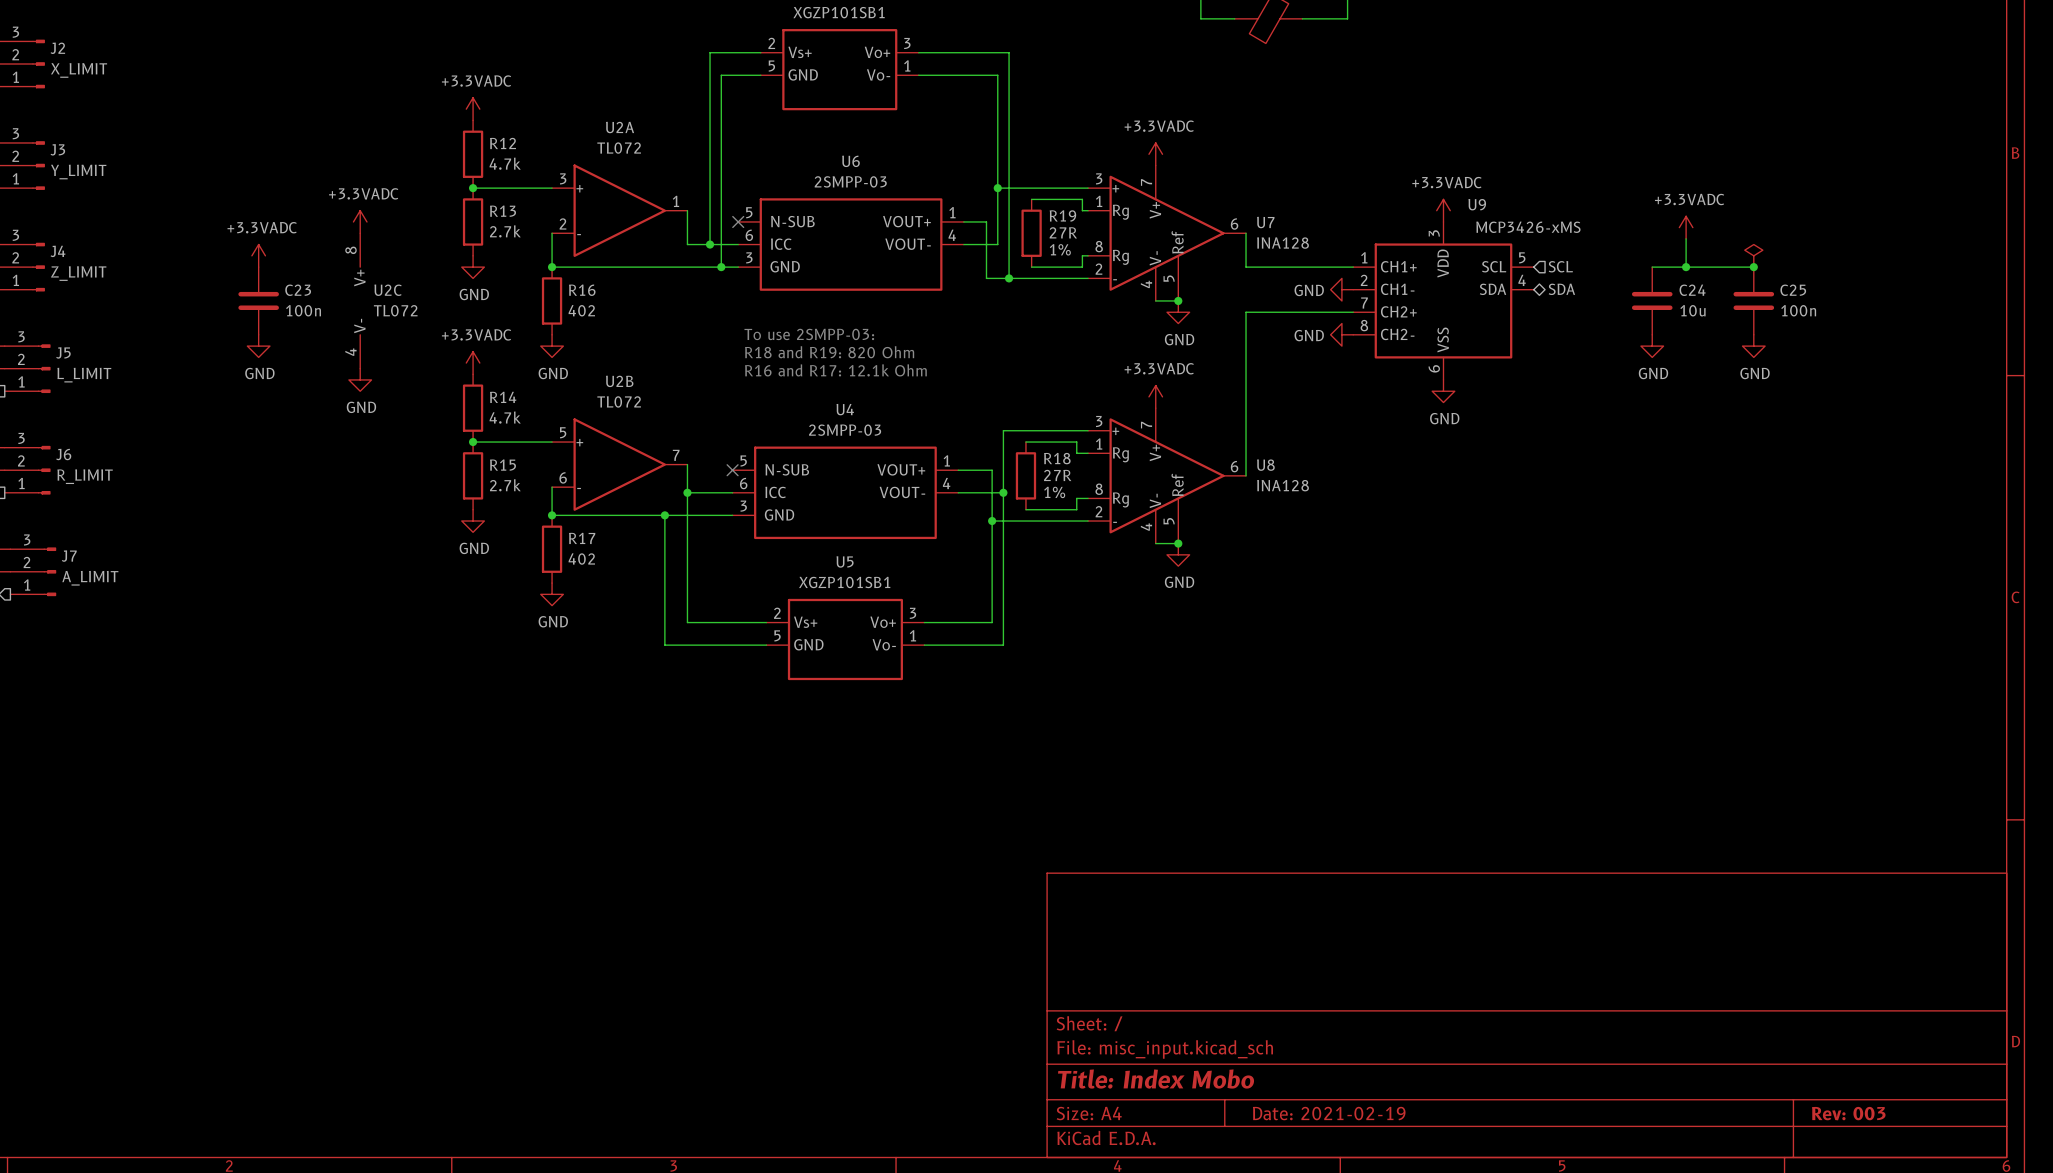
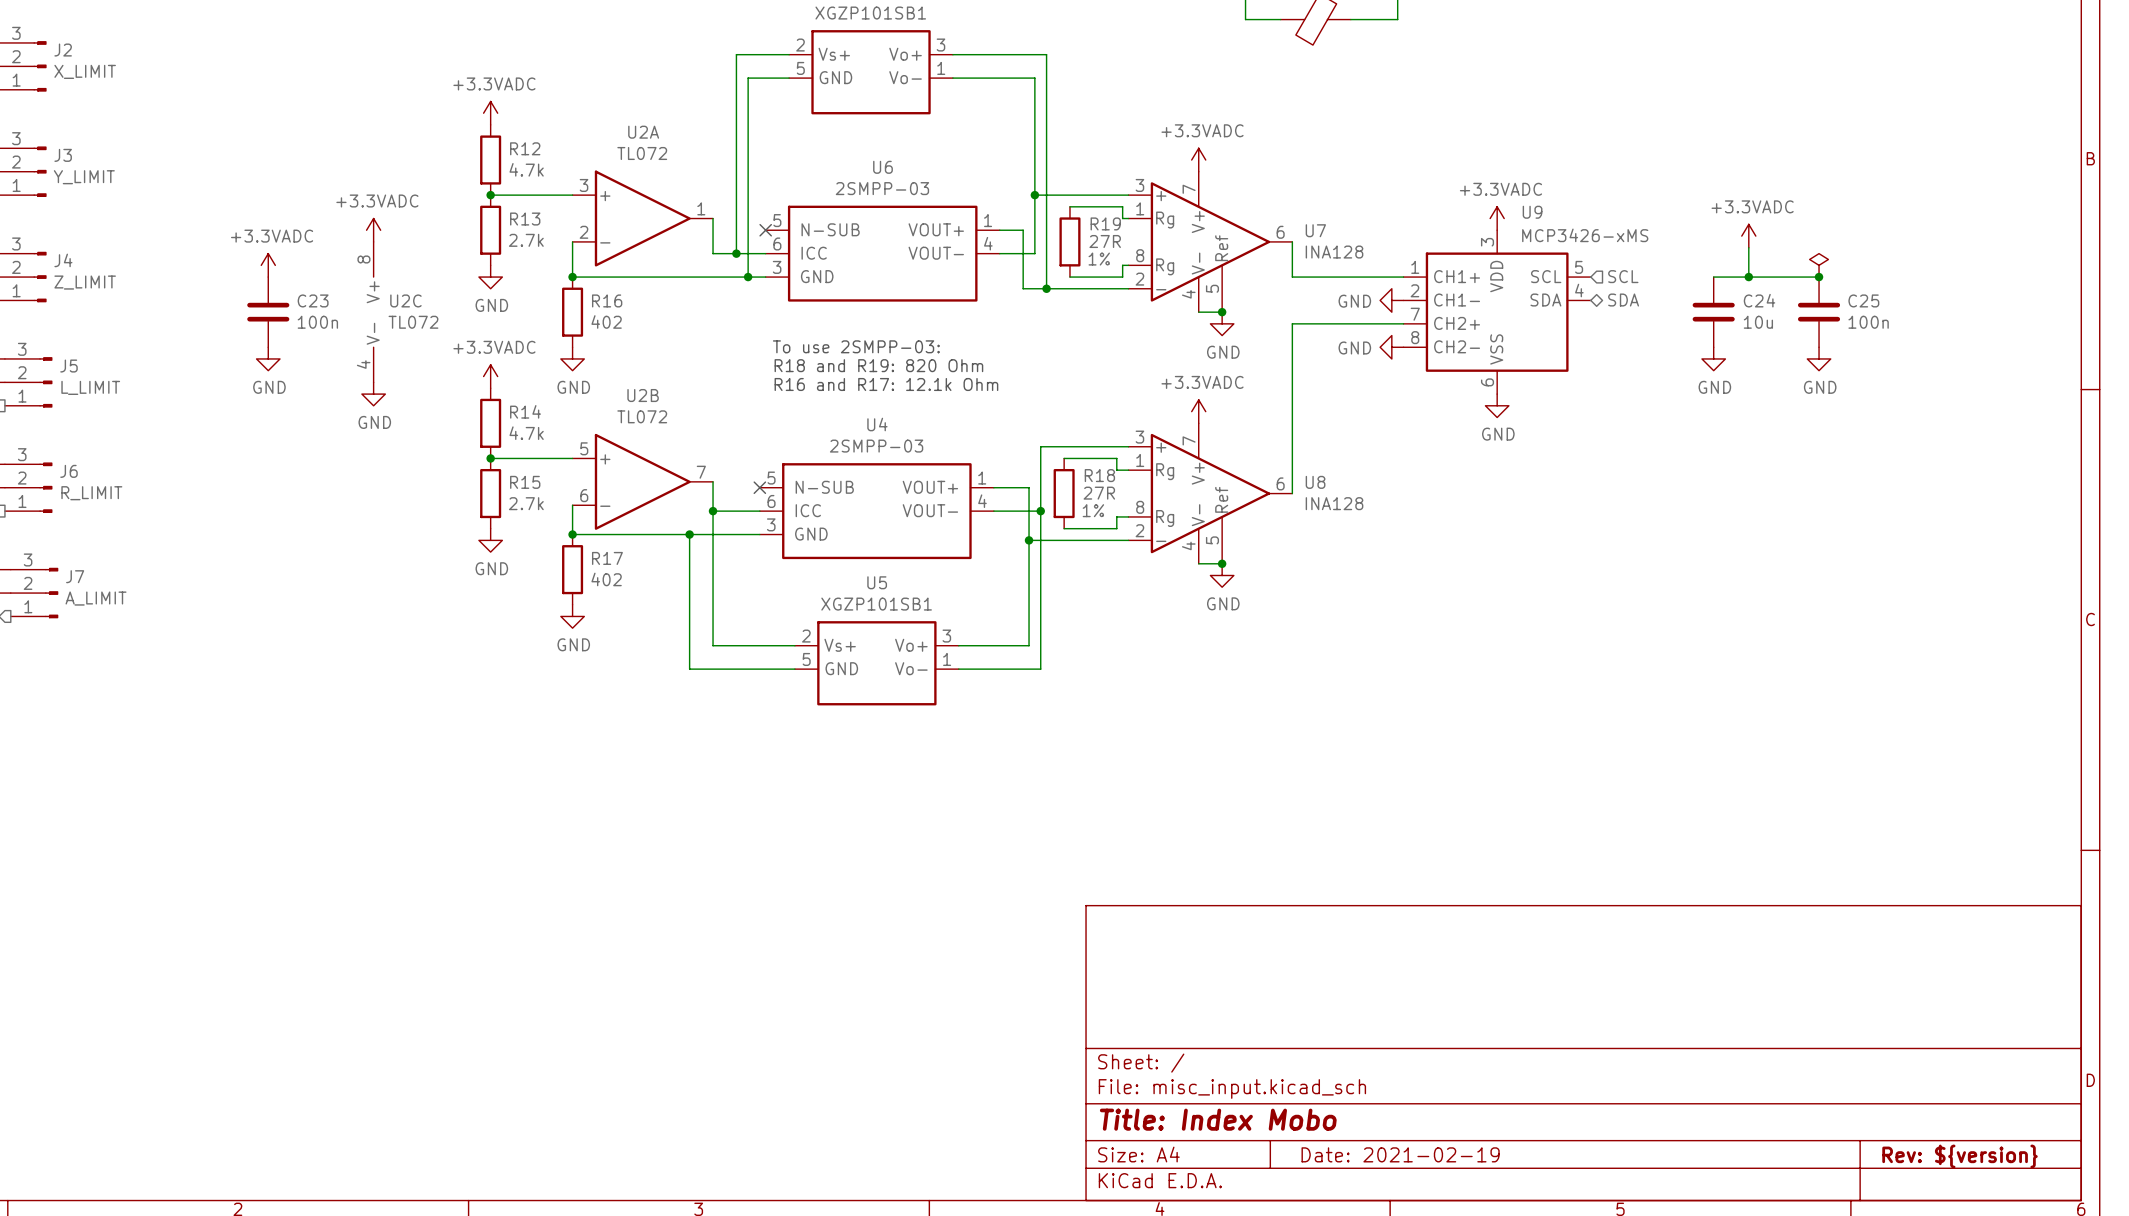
title block: Rev: 003 (1848, 1113) -> Rev: ${version} (1960, 1156)

